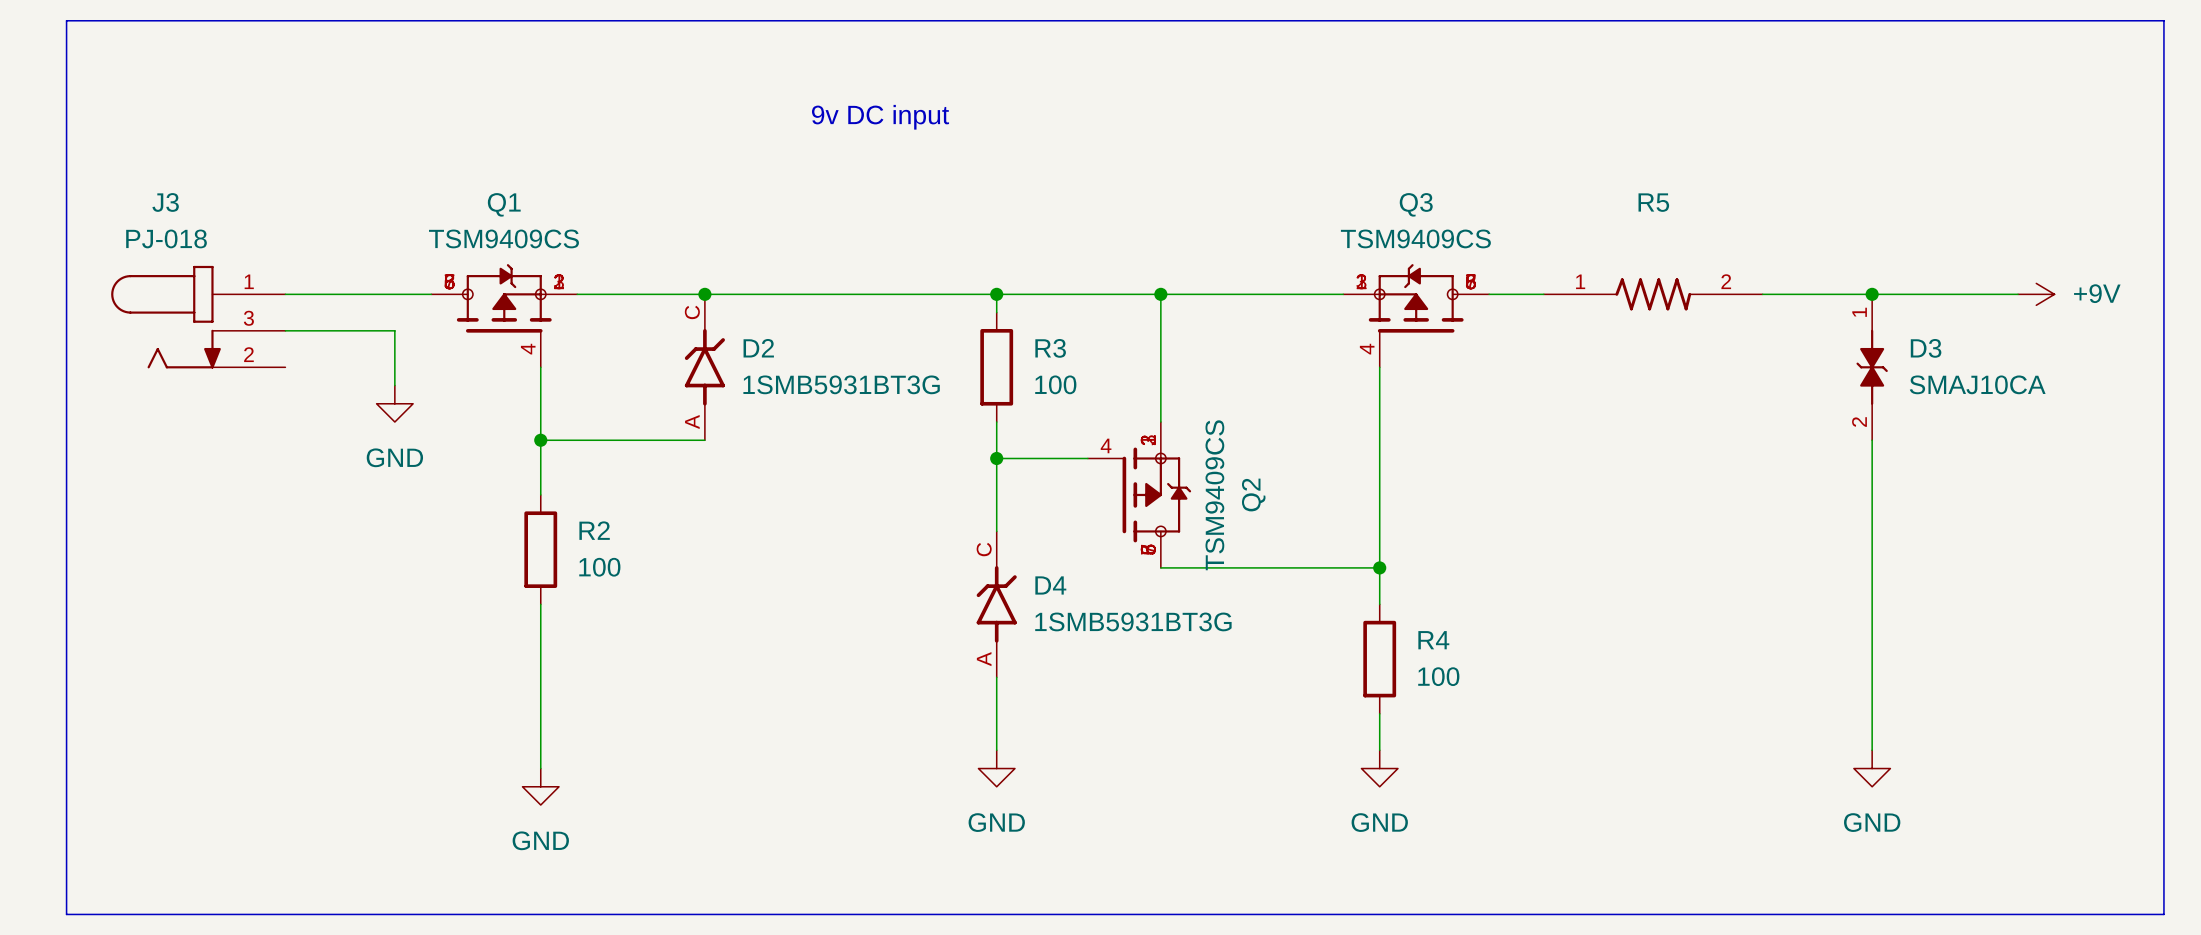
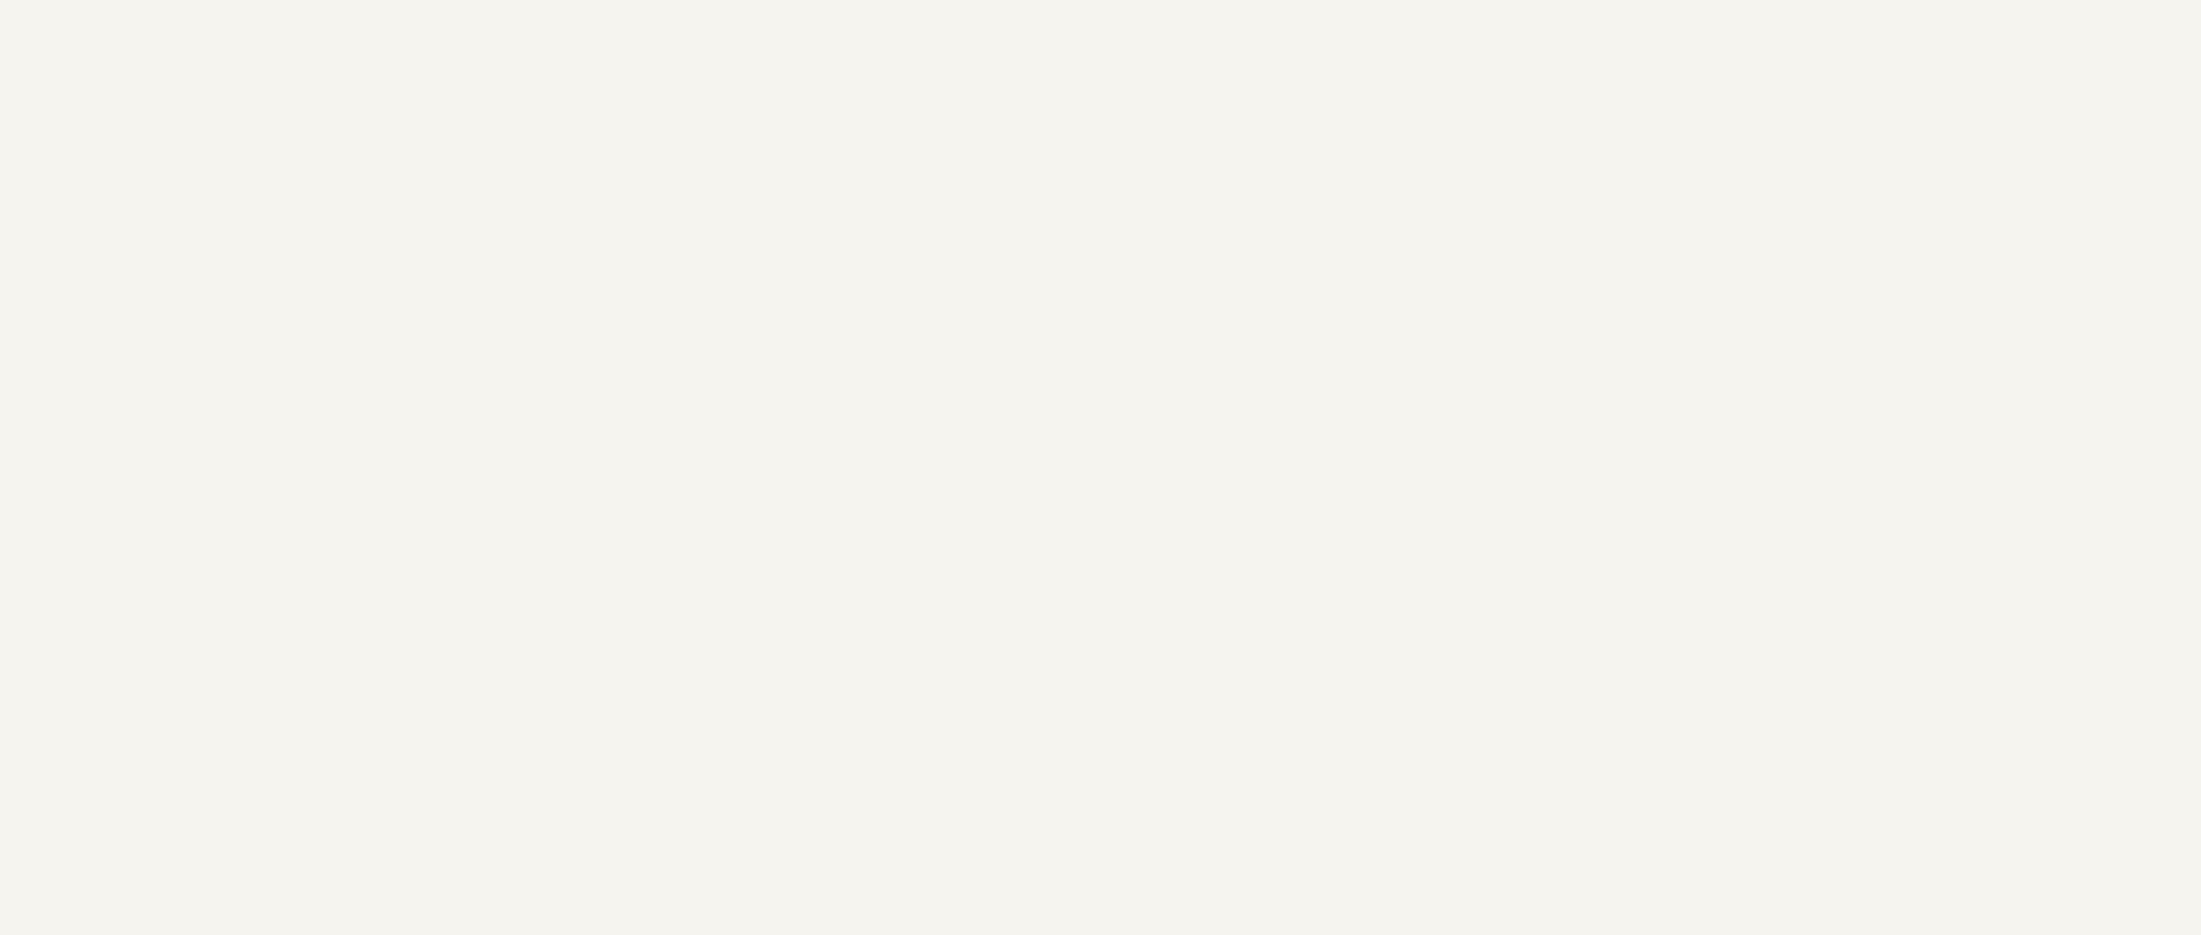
line: (66, 20) (2163, 20) (2163, 914) (66, 914) (66, 20) -> none
text: 9v DC input (880, 117) -> none
wire: (285, 294) (431, 294) -> none
wire: (577, 294) (1343, 294) -> none
junction: (704, 294) -> none
wire: (996, 294) (996, 312) -> none
junction: (996, 294) -> none
wire: (1160, 294) (1160, 422) -> none
junction: (1160, 294) -> none
wire: (1489, 294) (1543, 294) -> none
R5: (1653, 294) -> none
wire: (1762, 294) (2018, 294) -> none
junction: (1872, 294) -> none
power symbol: +9V (2036, 294) -> none
Q1: TSM9409CS (504, 315) -> none
Q3: TSM9409CS (1416, 315) -> none
J3: PJ-018 (198, 317) -> none
wire: (285, 330) (394, 330) (394, 385) -> none
wire: (540, 367) (540, 494) -> none
D2: 1SMB5931BT3G (704, 367) -> none
R3: 100 (996, 367) -> none
wire: (1379, 367) (1379, 604) -> none
D3: SMAJ10CA (1872, 367) -> none
power symbol: GND (394, 403) -> none
wire: (996, 422) (996, 531) -> none
wire: (540, 440) (704, 440) -> none
junction: (540, 440) -> none
wire: (1872, 440) (1872, 750) -> none
wire: (996, 458) (1087, 458) -> none
junction: (996, 458) -> none
Q2: TSM9409CS (1139, 494) -> none
R2: 100 (540, 549) -> none
wire: (1160, 567) (1379, 567) -> none
junction: (1379, 567) -> none
wire: (540, 604) (540, 768) -> none
D4: 1SMB5931BT3G (996, 604) -> none
R4: 100 (1379, 659) -> none
wire: (996, 677) (996, 750) -> none
wire: (1379, 713) (1379, 750) -> none
power symbol: GND (996, 768) -> none
power symbol: GND (1379, 768) -> none
power symbol: GND (1872, 768) -> none
power symbol: GND (540, 786) -> none

